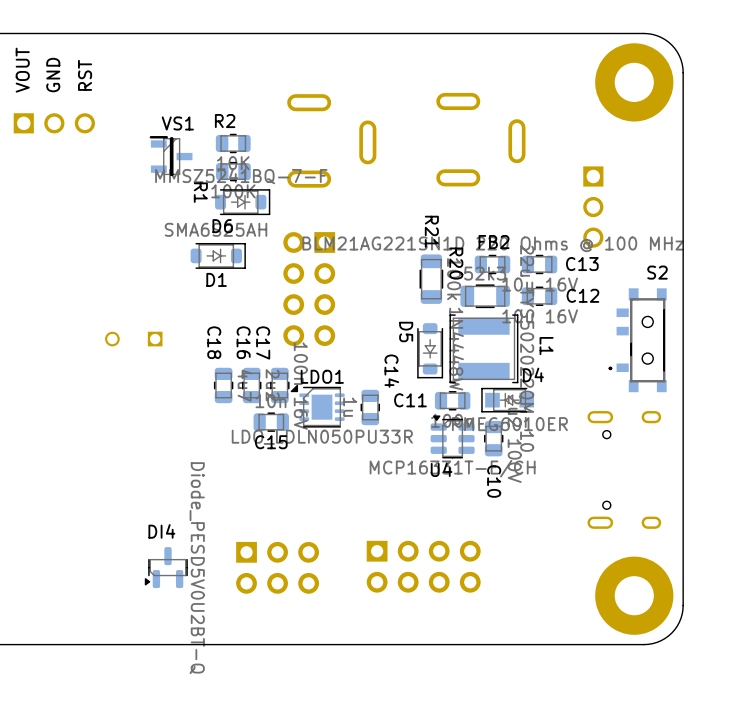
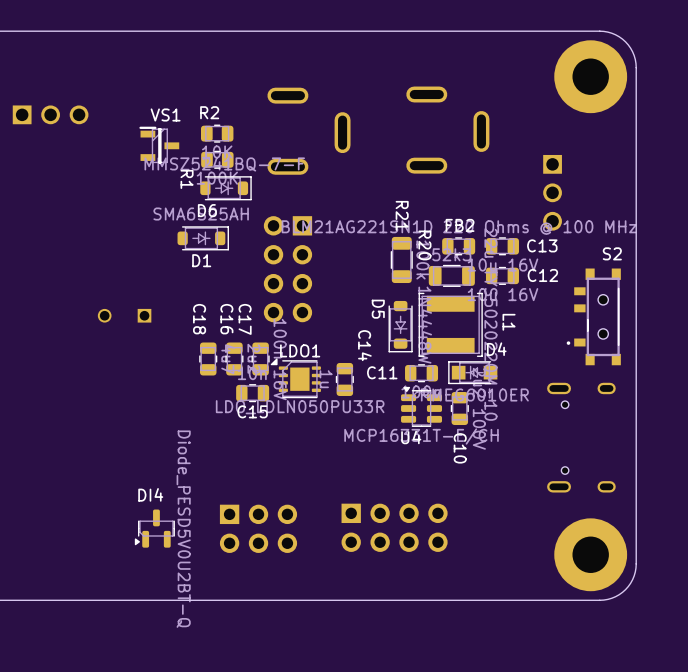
text: VOUT (22, 70) -> none
text: GND (53, 75) -> none
text: RST (85, 75) -> none

